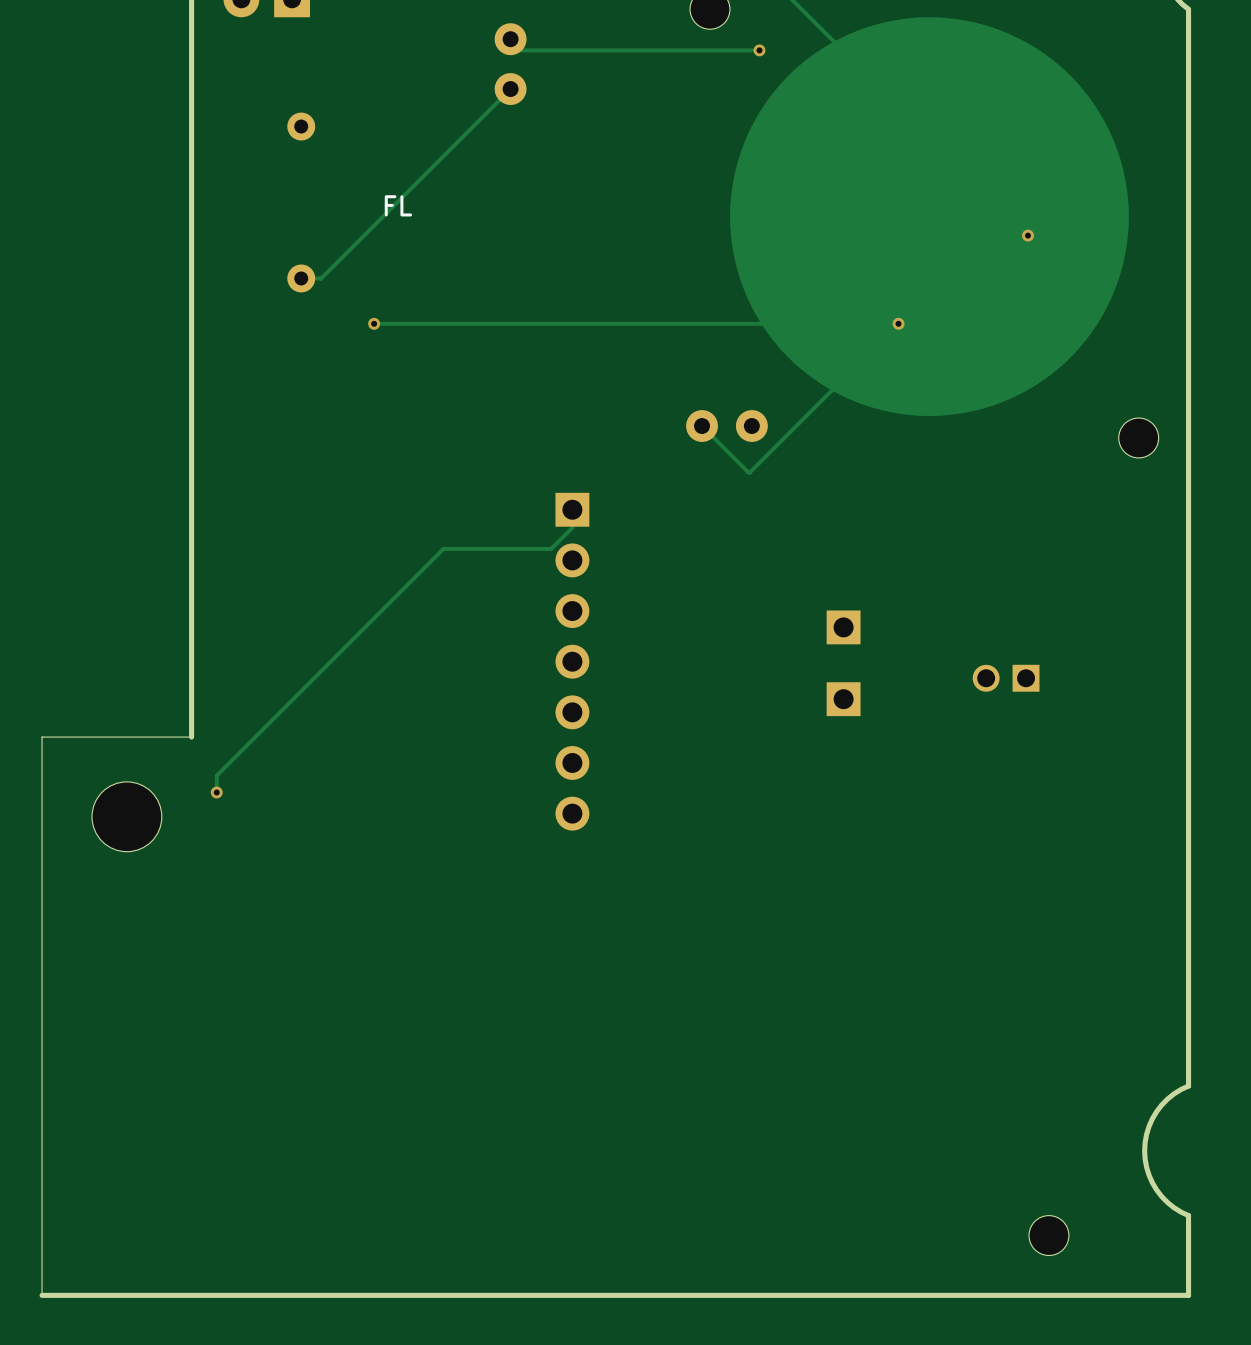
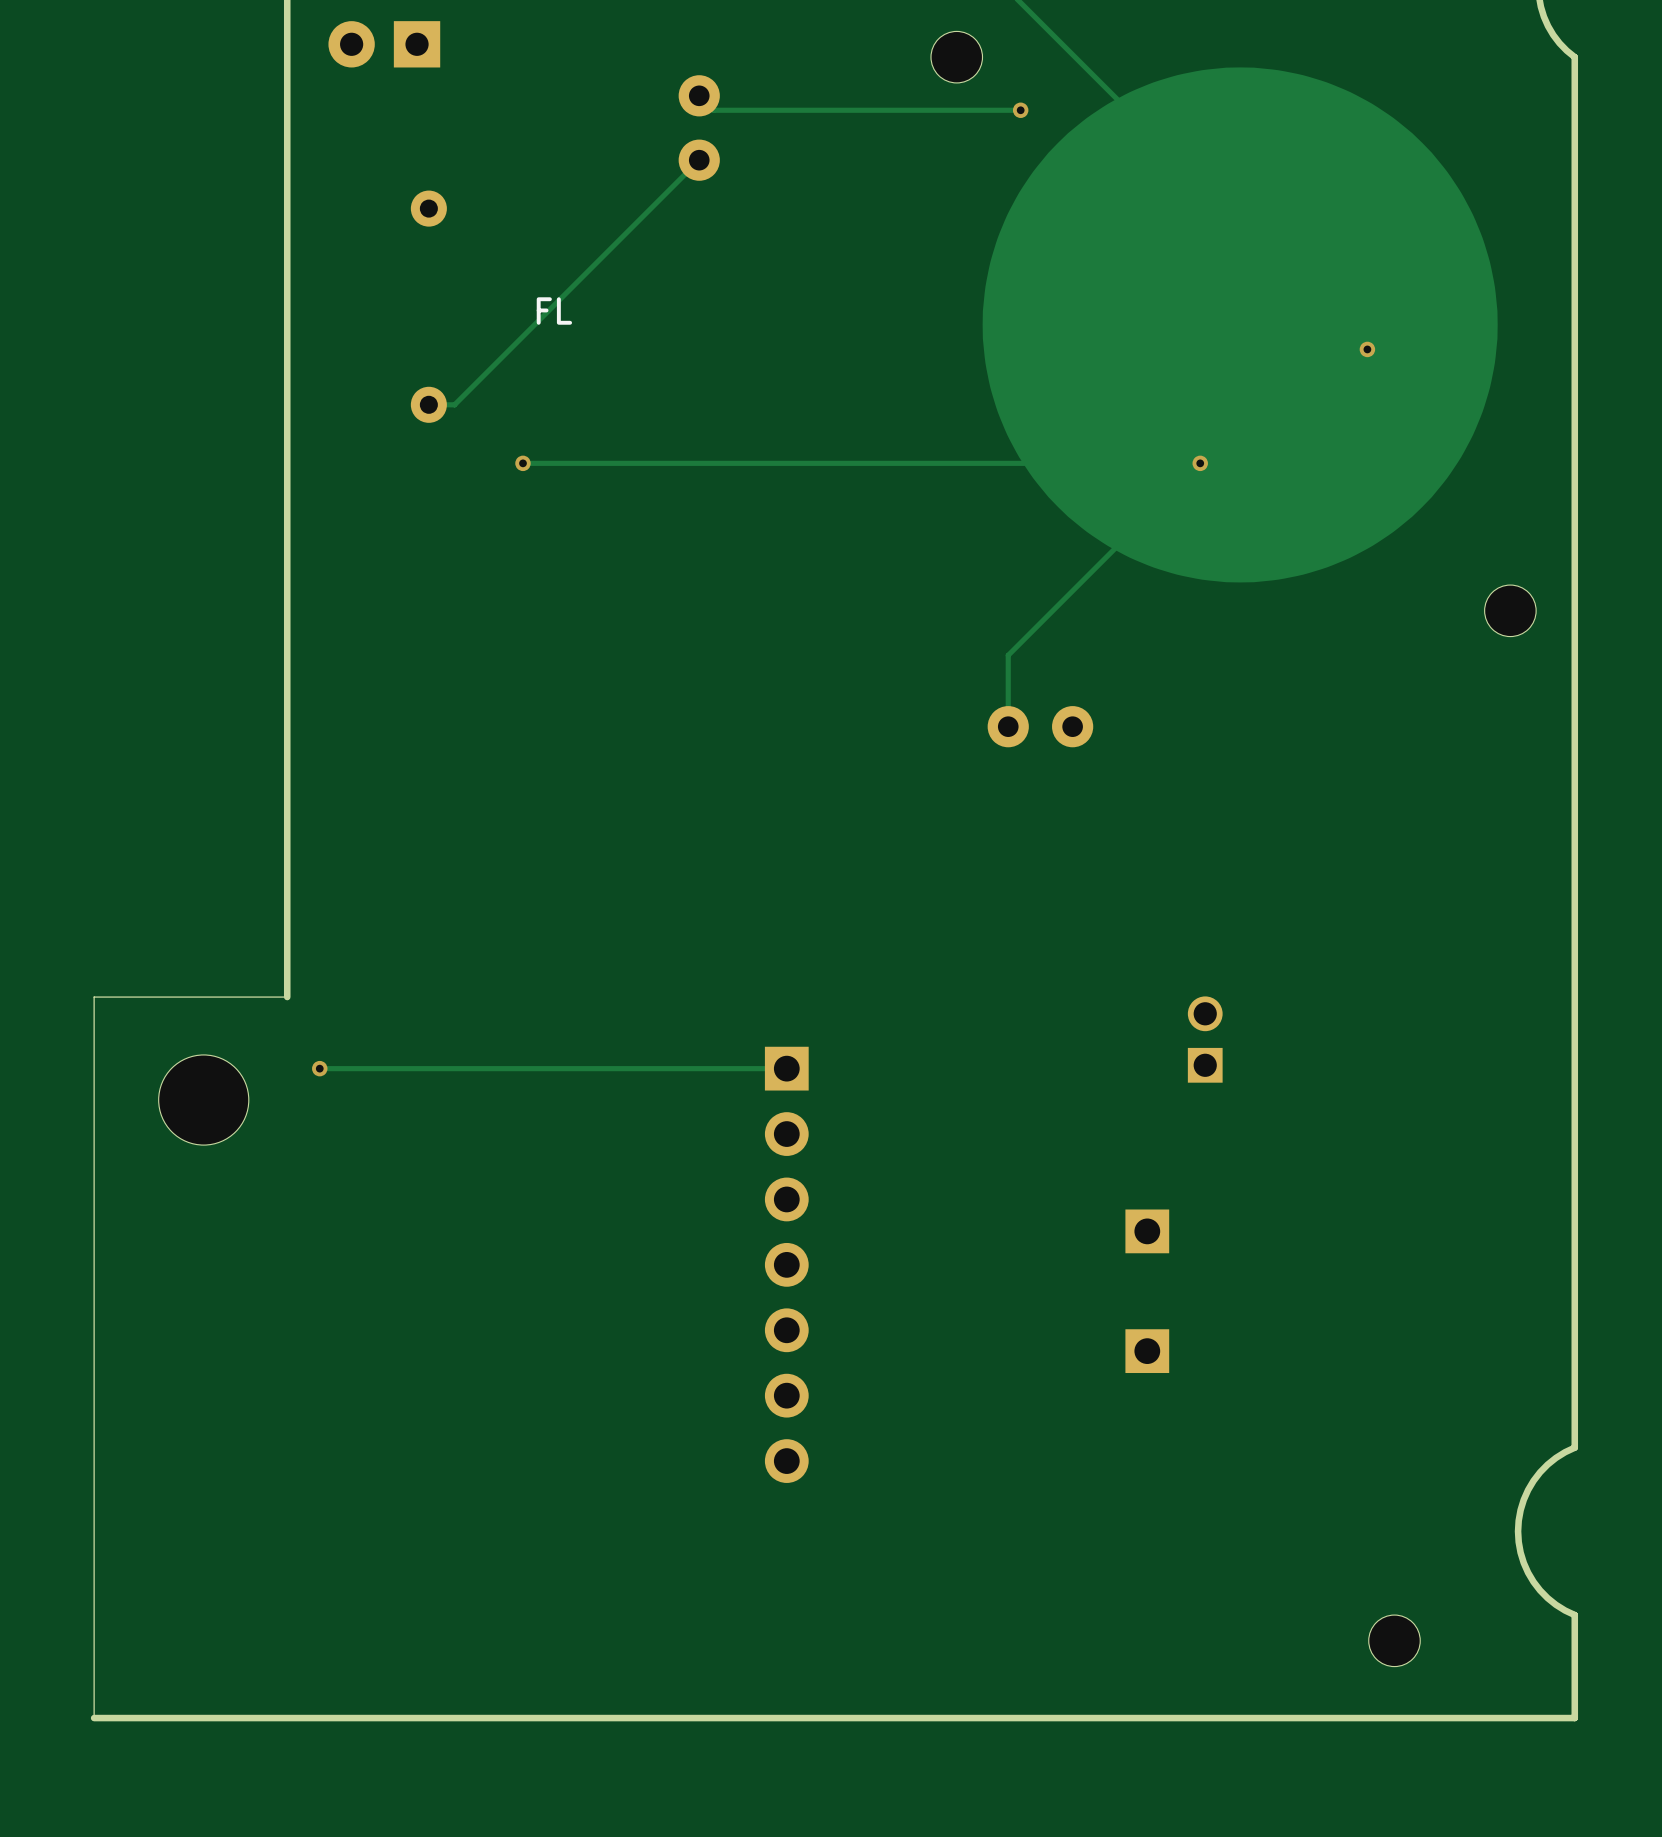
track: (702, 426) (749, 472) -> (1008, 726) (1008, 655)
part position: (726, 426) -> (1040, 726)
track: (572, 509) (572, 527) (551, 548) (443, 548) (216, 775) (216, 792) -> (786, 1068) (319, 1068)
part: (843, 627) -> none
part position: (572, 661) -> (786, 1264)
part rotation: 0° (1006, 678) -> 90° clockwise (1205, 1039)
part position: (1006, 678) -> (1205, 1039)
part: (843, 699) -> none
part: none -> (1147, 1231)
part: none -> (1147, 1351)

